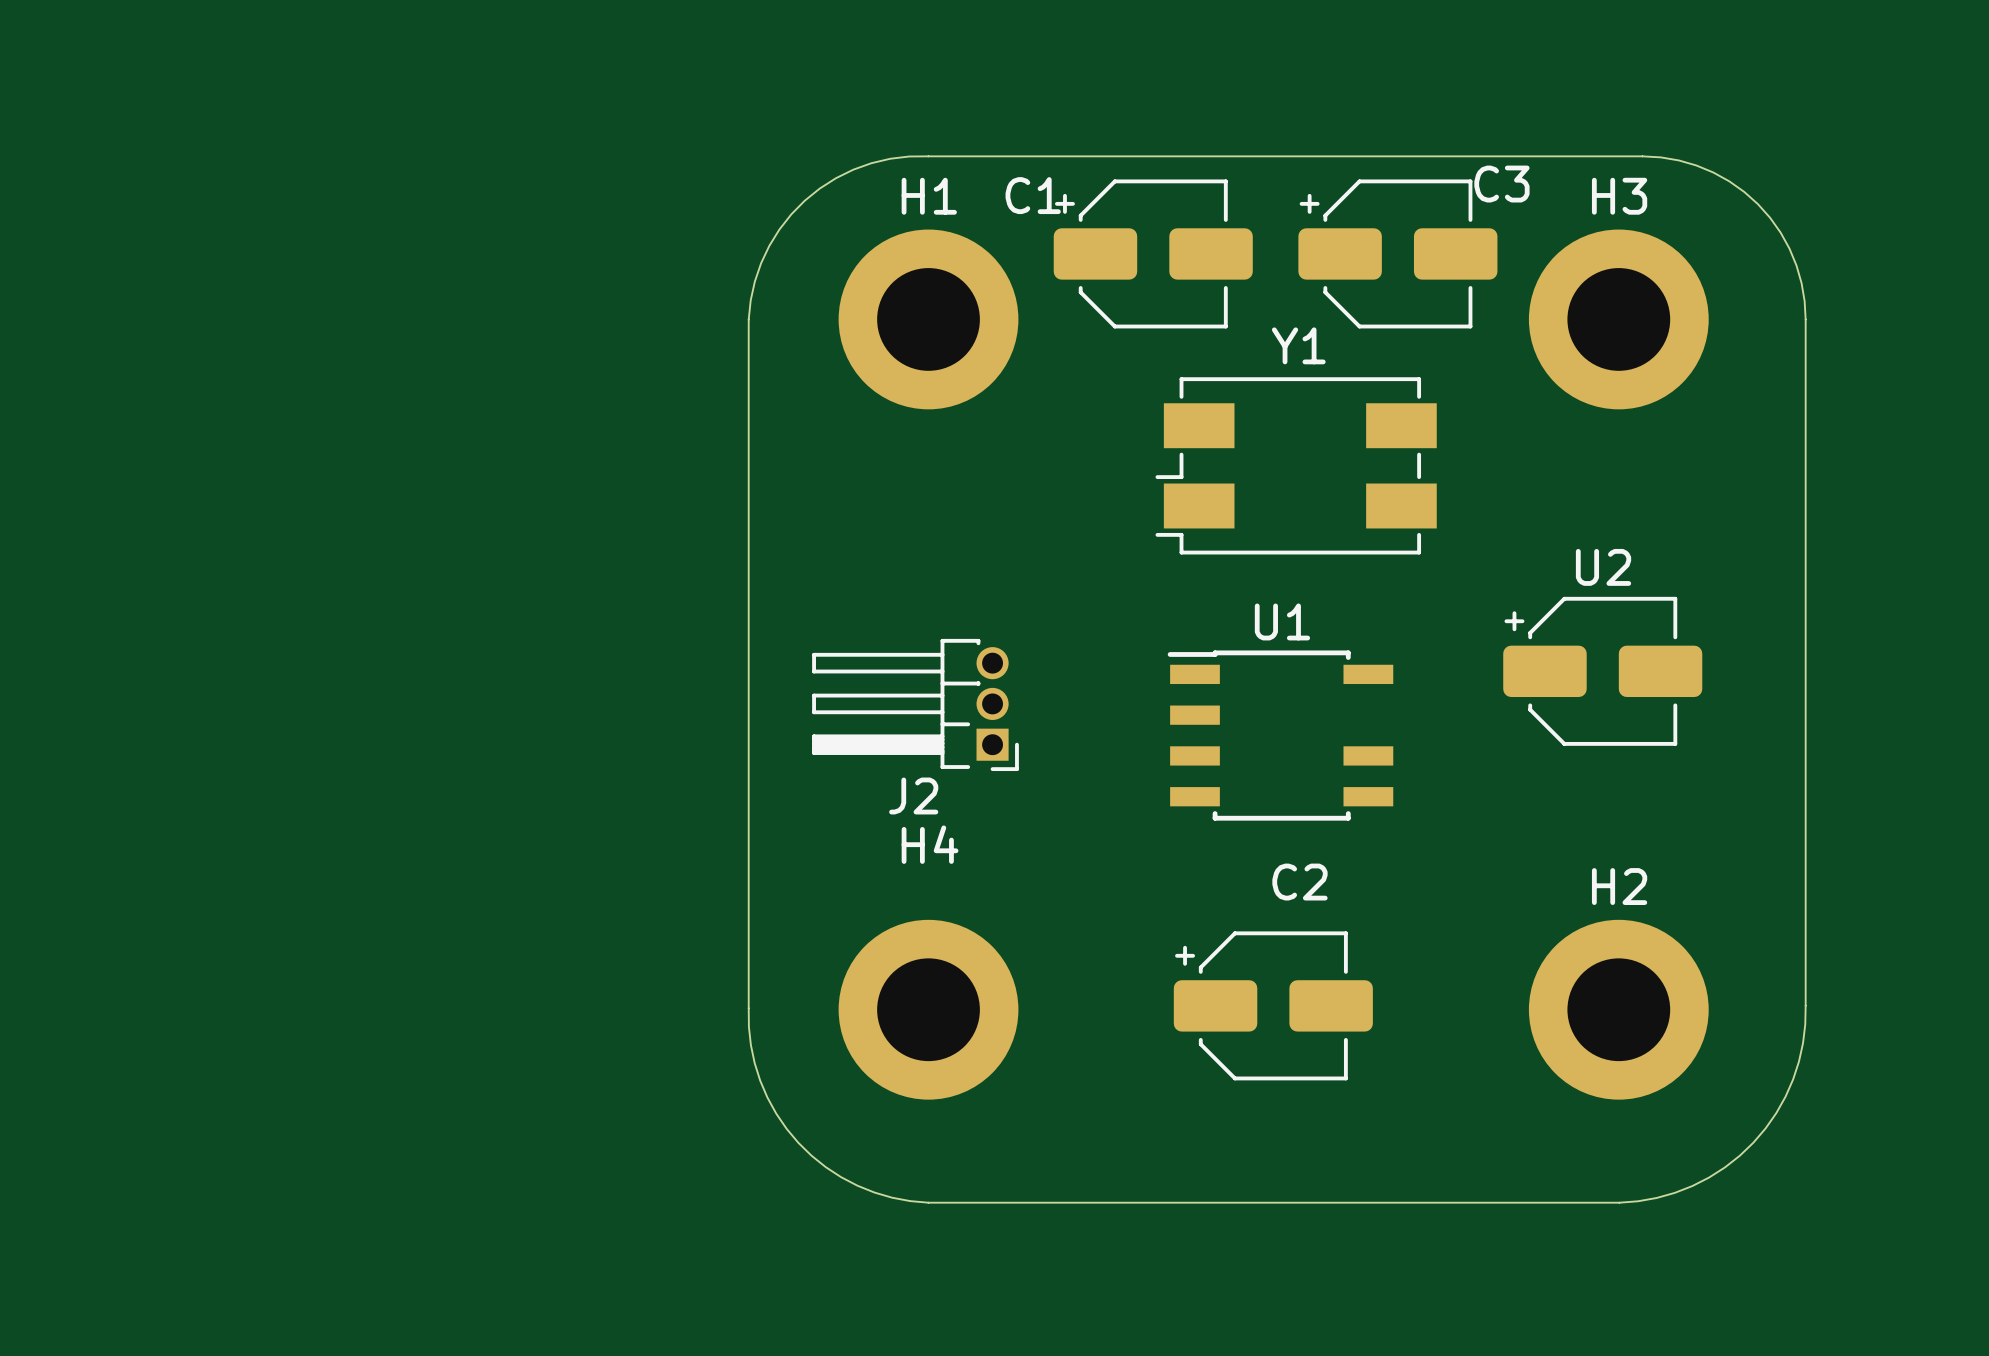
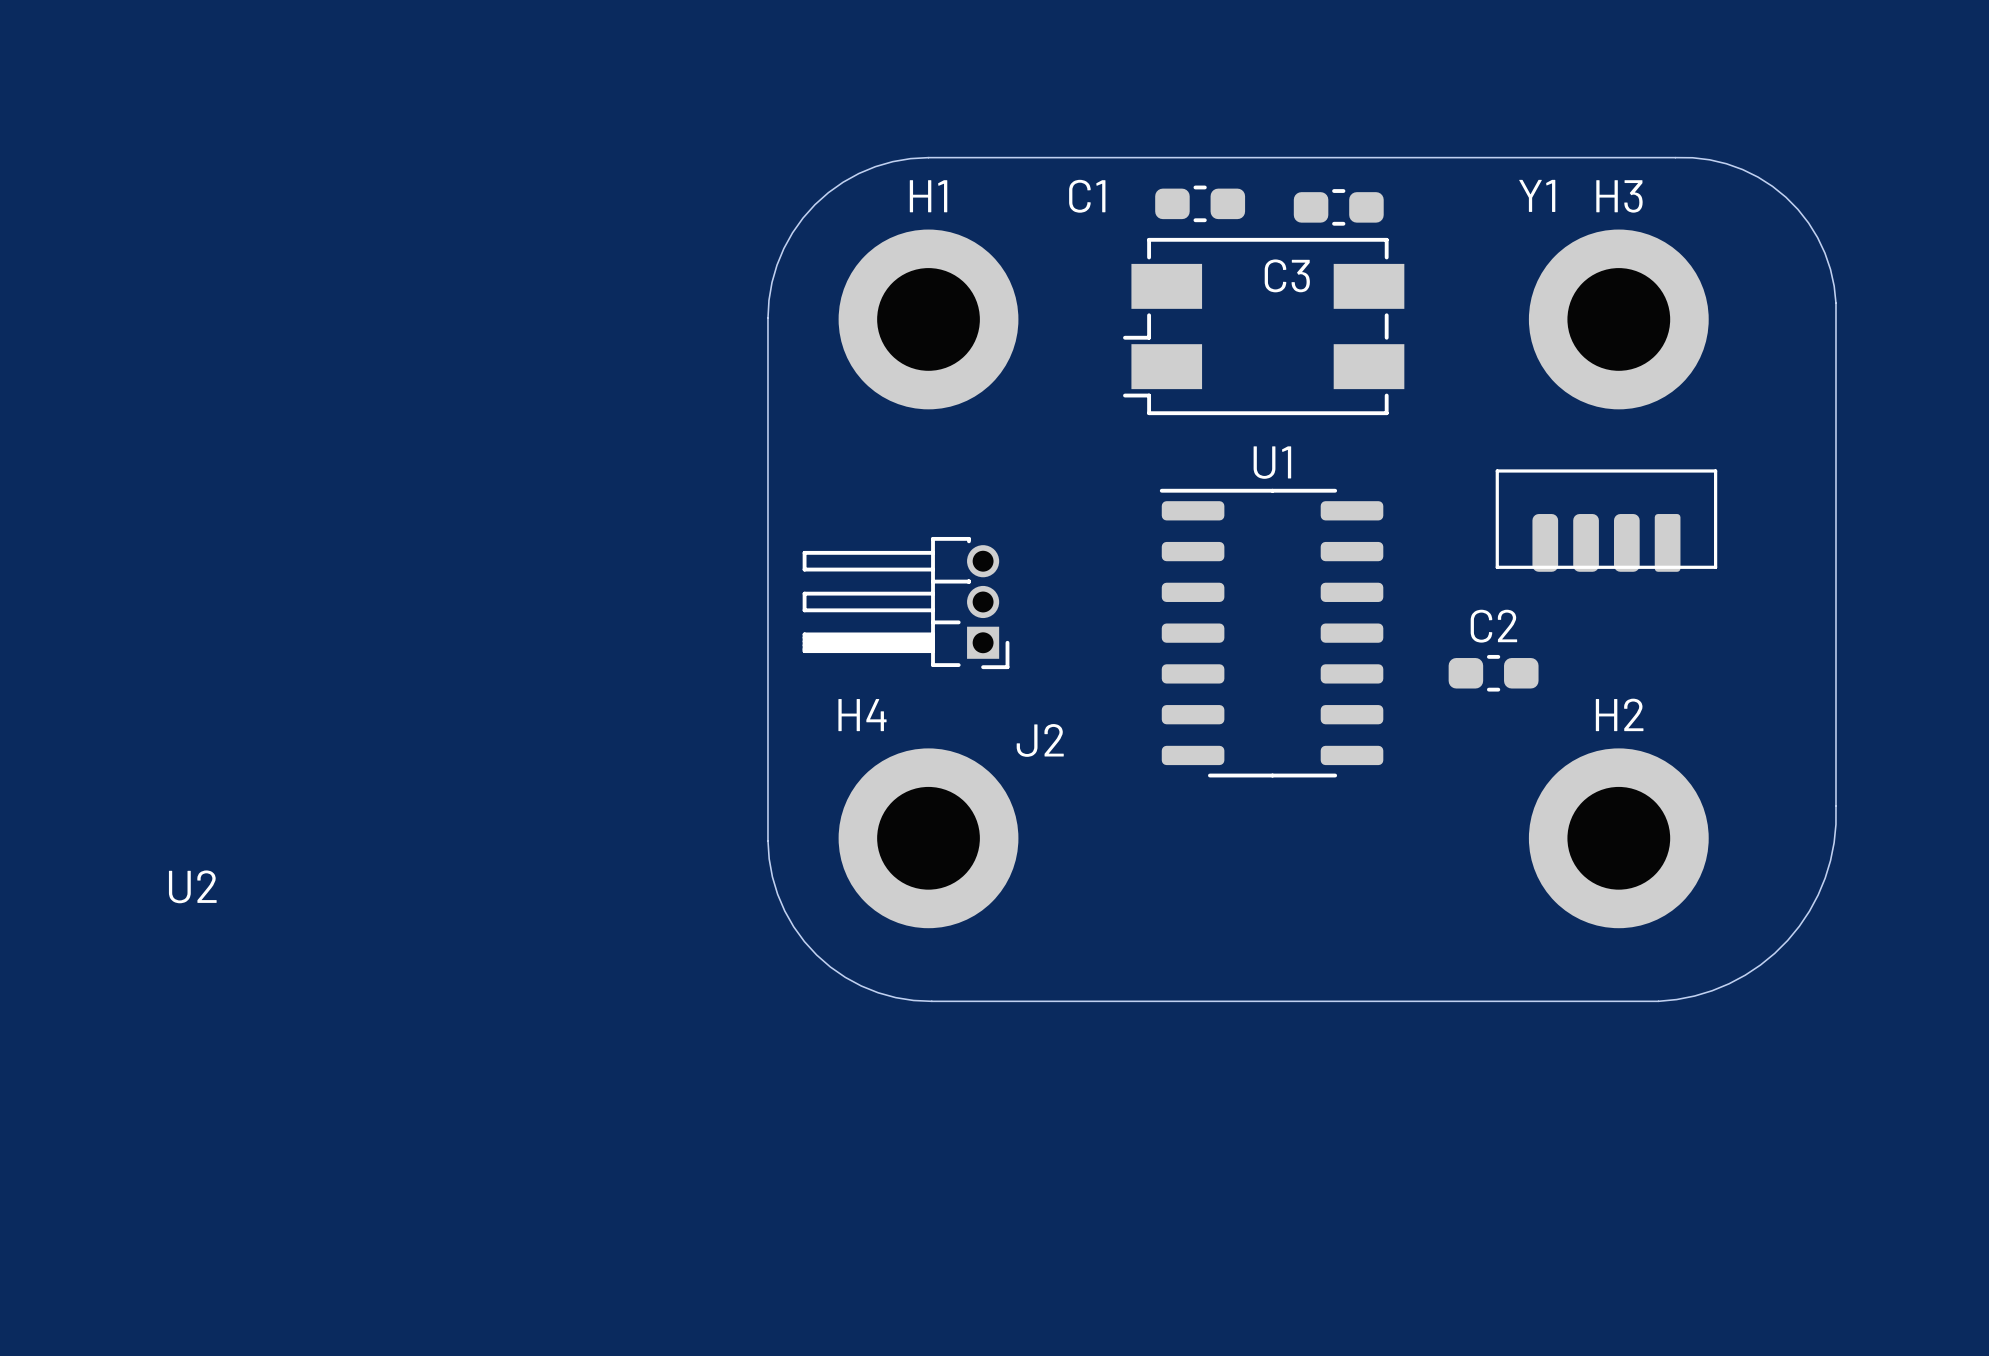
board edge: (928, 156) (1660, 157) (1678, 160) (1713, 172) (1744, 191) (1770, 217) (1780, 232) (1796, 265) (1804, 301) (1805, 319) (1805, 1024) (1798, 1061) (1785, 1096) (1765, 1128) (1739, 1155) (1709, 1177) (1692, 1186) (1656, 1197) (1619, 1202) (928, 1202) (892, 1197) (874, 1192) (841, 1177) (811, 1155) (786, 1128) (767, 1097) (760, 1080) (754, 1063) (748, 1026) (748, 319) (750, 300) (761, 263) (779, 229) (791, 214) (819, 188) (836, 178) (871, 163) (909, 156) (928, 156) -> (928, 157) (892, 161) (858, 173) (828, 192) (815, 204) (792, 232) (783, 248) (772, 282) (768, 300) (769, 858) (777, 894) (784, 911) (793, 926) (816, 954) (830, 966) (861, 985) (878, 992) (913, 1000) (1658, 1001) (1694, 996) (1729, 983) (1760, 965) (1787, 940) (1809, 911) (1825, 878) (1830, 860) (1835, 824) (1835, 303) (1834, 286) (1824, 253) (1808, 222) (1785, 197) (1758, 177) (1742, 169) (1726, 163) (1692, 157) (928, 157)
C1 footprint: [1053, 179, 1253, 329] -> [1155, 185, 1246, 223]
C3 footprint: [1298, 179, 1498, 329] -> [1293, 189, 1384, 226]
C3 name position: C3 (1501, 184) -> C3 (1287, 275)
Y1 name position: Y1 (1298, 345) -> Y1 (1537, 195)
Y1 position: (1296, 465) -> (1263, 326)
U2 name position: U2 (1603, 567) -> U2 (192, 886)
U2 footprint: [1503, 596, 1703, 746] -> [1495, 469, 1718, 572]
U1 footprint: [1167, 650, 1394, 821] -> [1159, 488, 1384, 778]
J2 position: (915, 704) -> (906, 603)
J2 name position: J2 (913, 795) -> J2 (1040, 740)
H4 name position: H4 (930, 844) -> H4 (862, 715)
C2 name position: C2 (1299, 882) -> C2 (1493, 626)
C2 footprint: [1173, 931, 1373, 1081] -> [1448, 654, 1539, 692]
H4 position: (928, 1009) -> (928, 838)
H2 position: (1618, 1009) -> (1618, 838)

